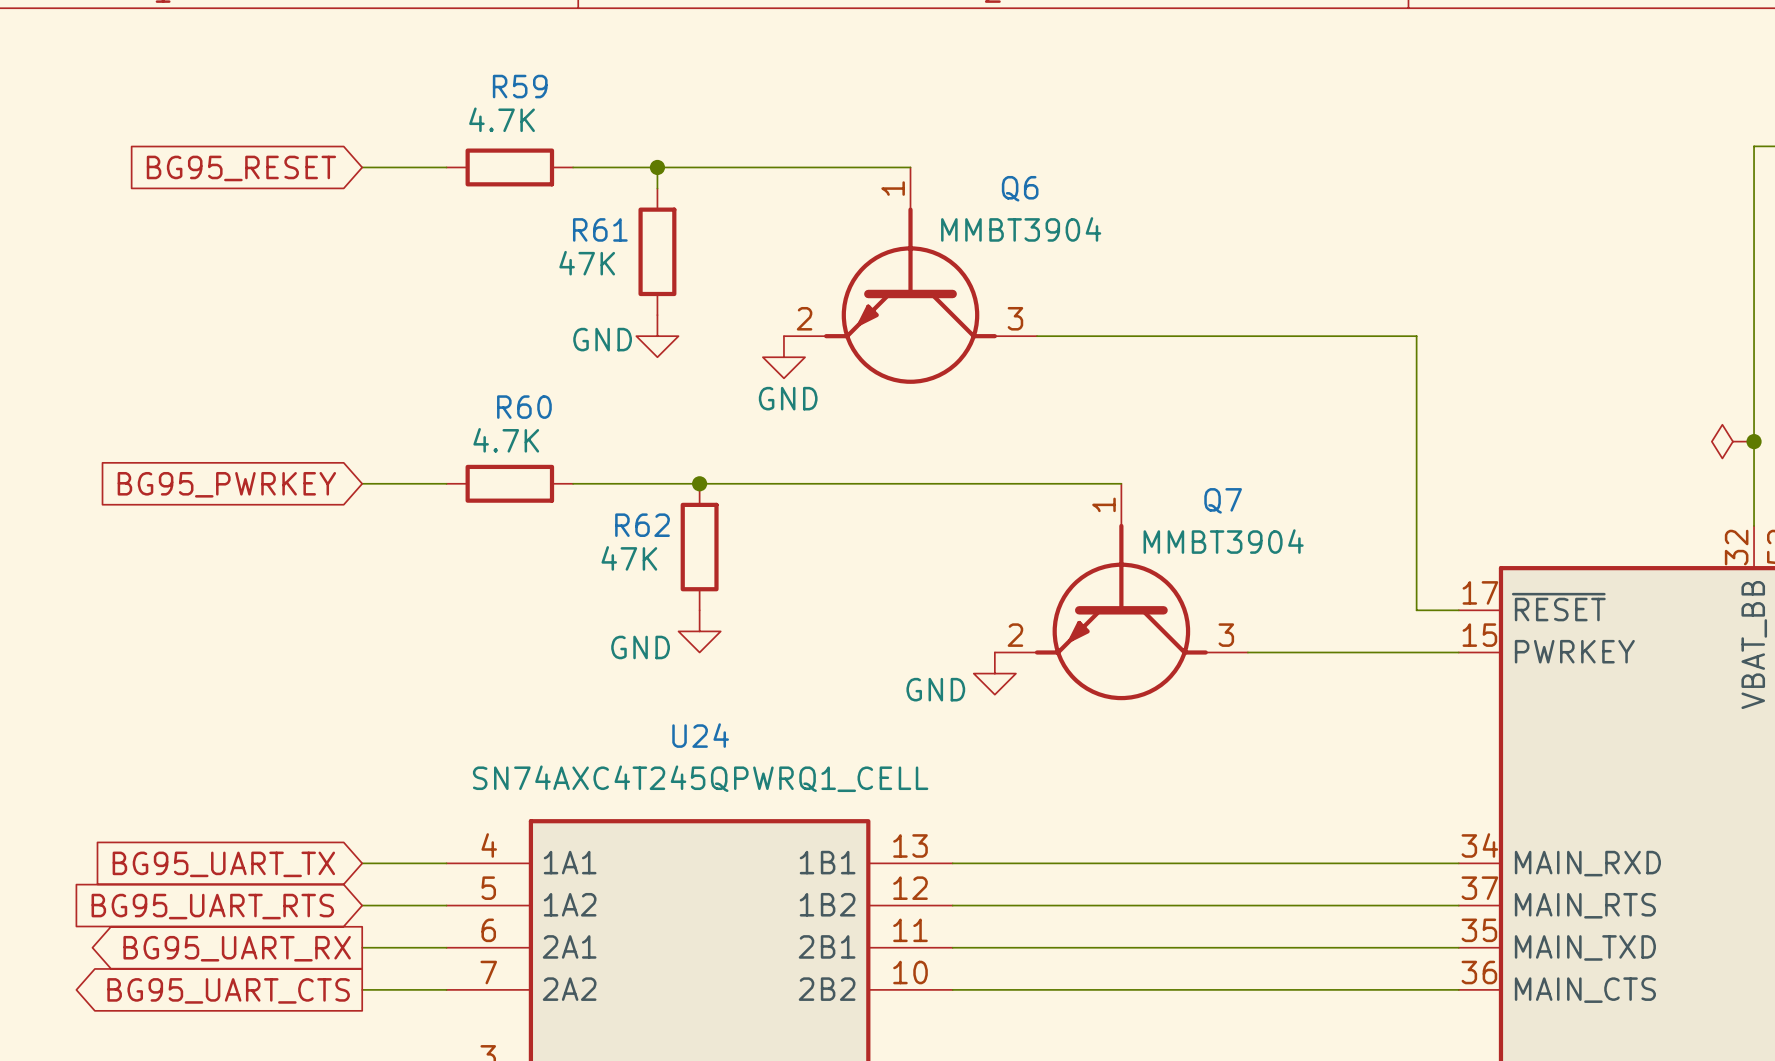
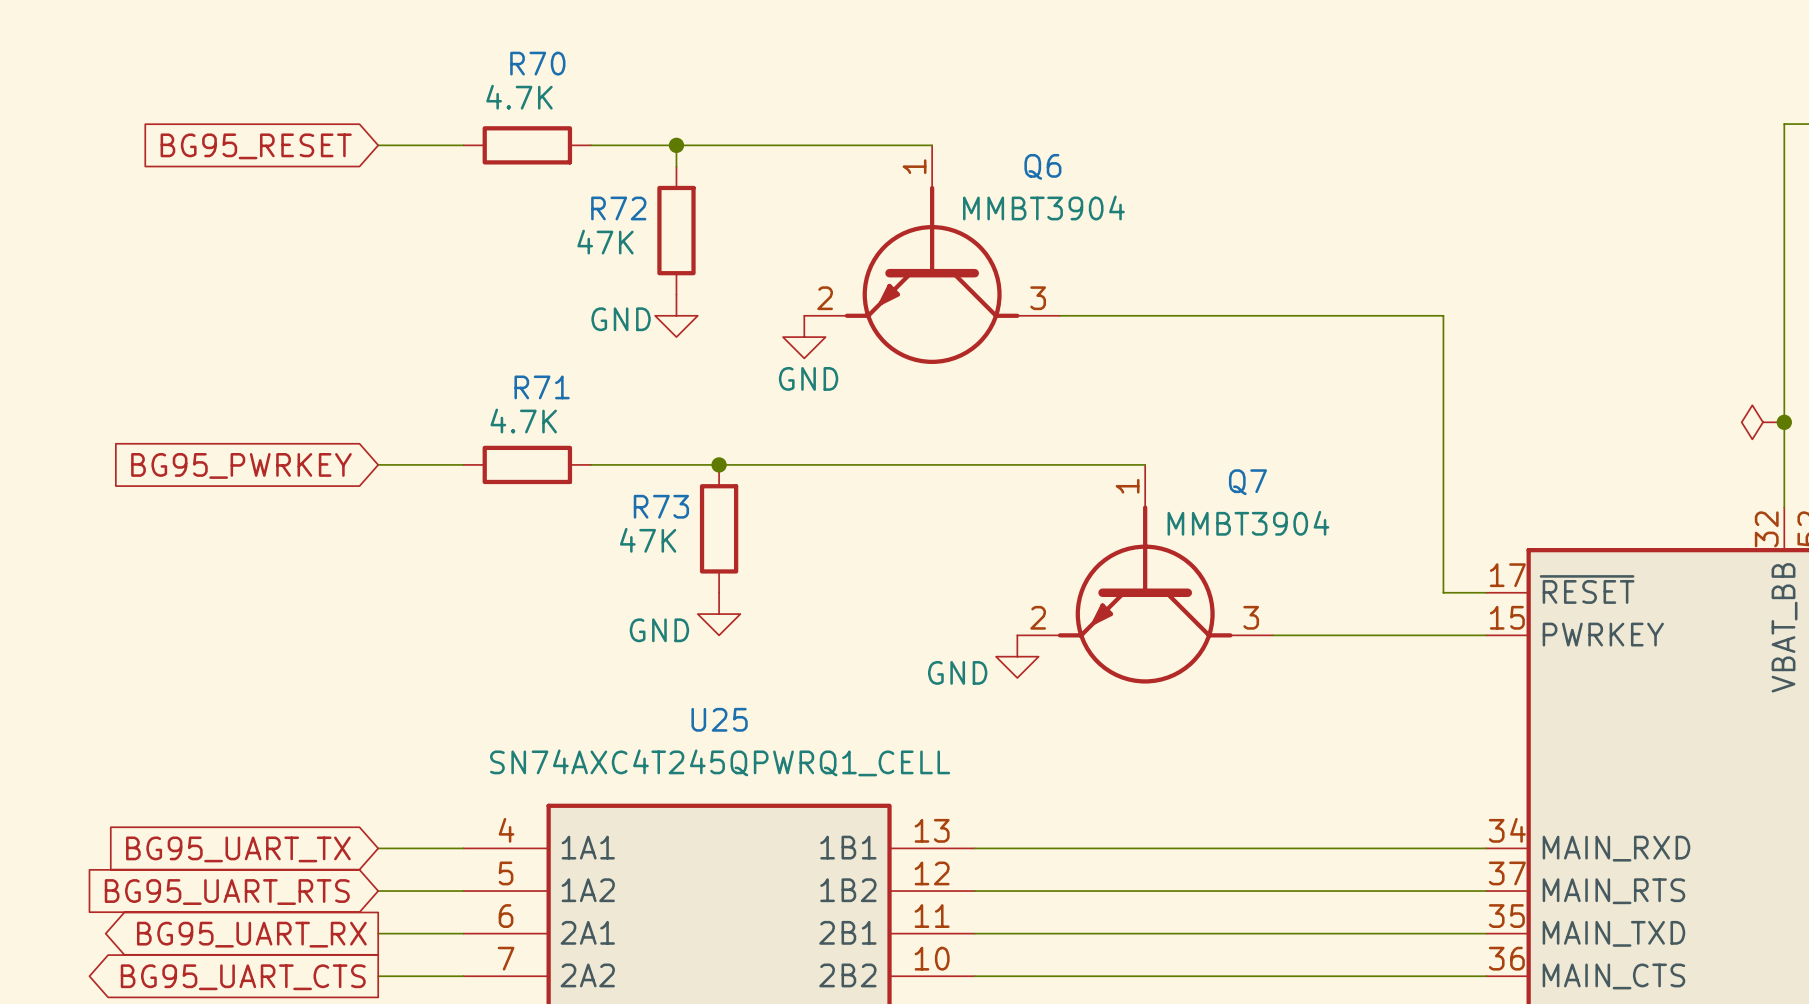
R59 name: R59 (520, 86) -> R70 (537, 63)
R61 name: R61 (600, 229) -> R72 (618, 208)
R60 name: R60 (524, 407) -> R71 (542, 387)
R62 name: R62 (642, 525) -> R73 (661, 506)
U24 name: U24 (700, 735) -> U25 (719, 719)

